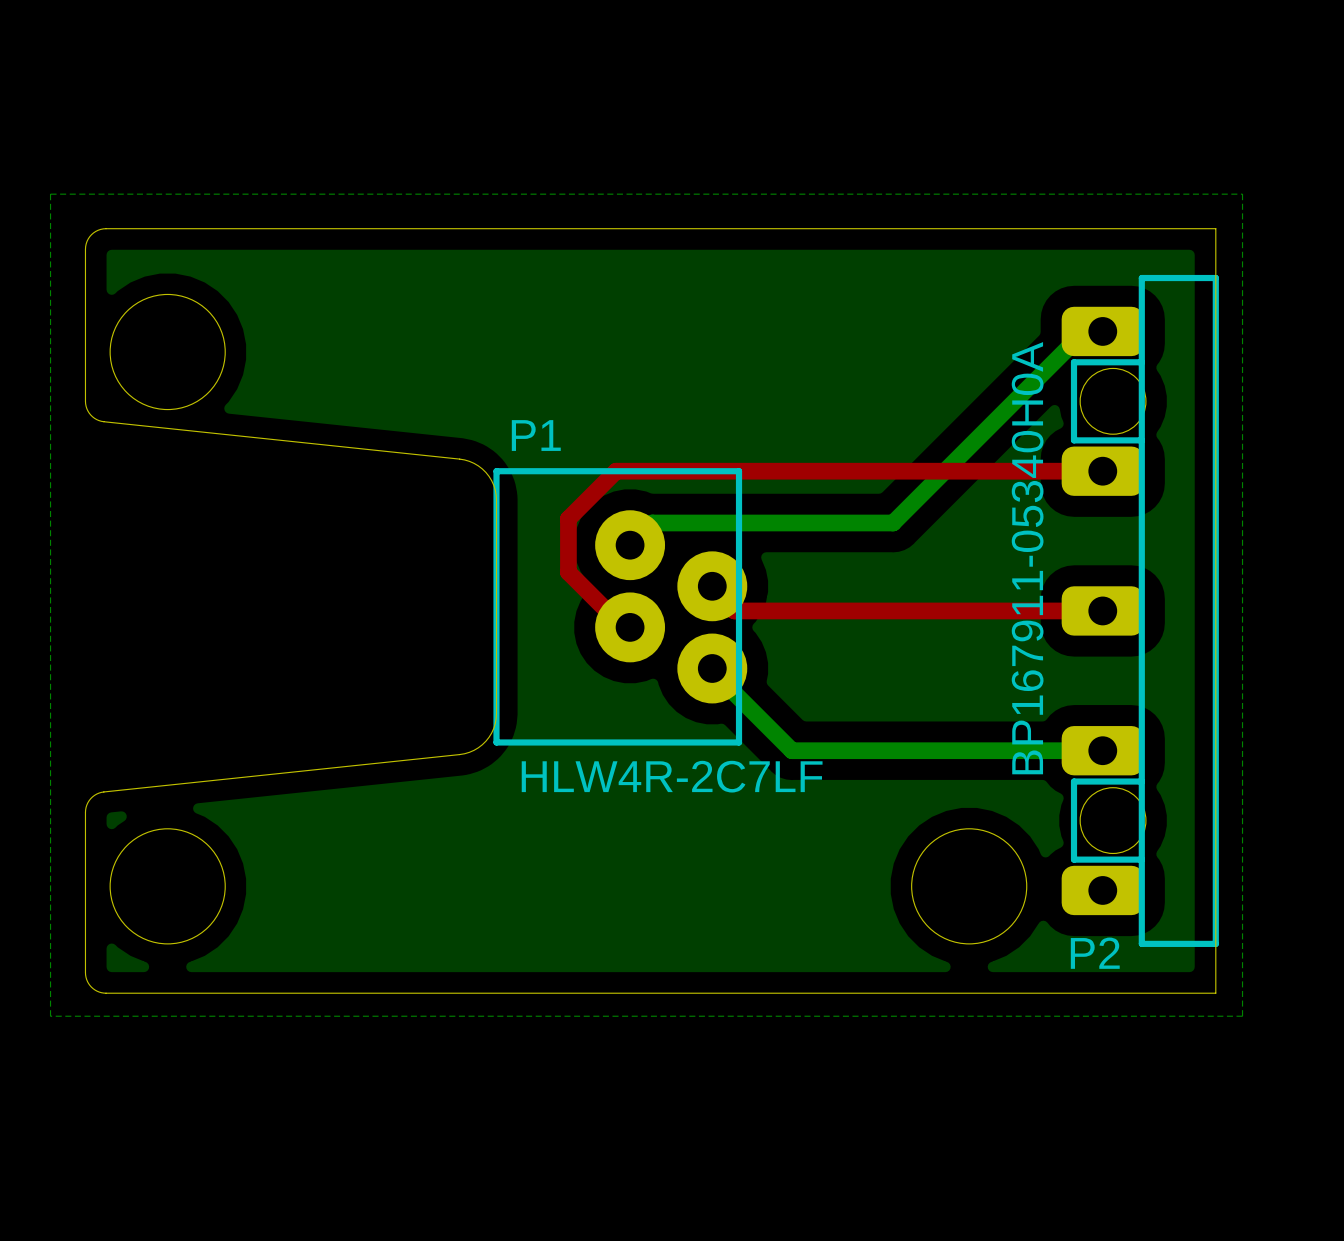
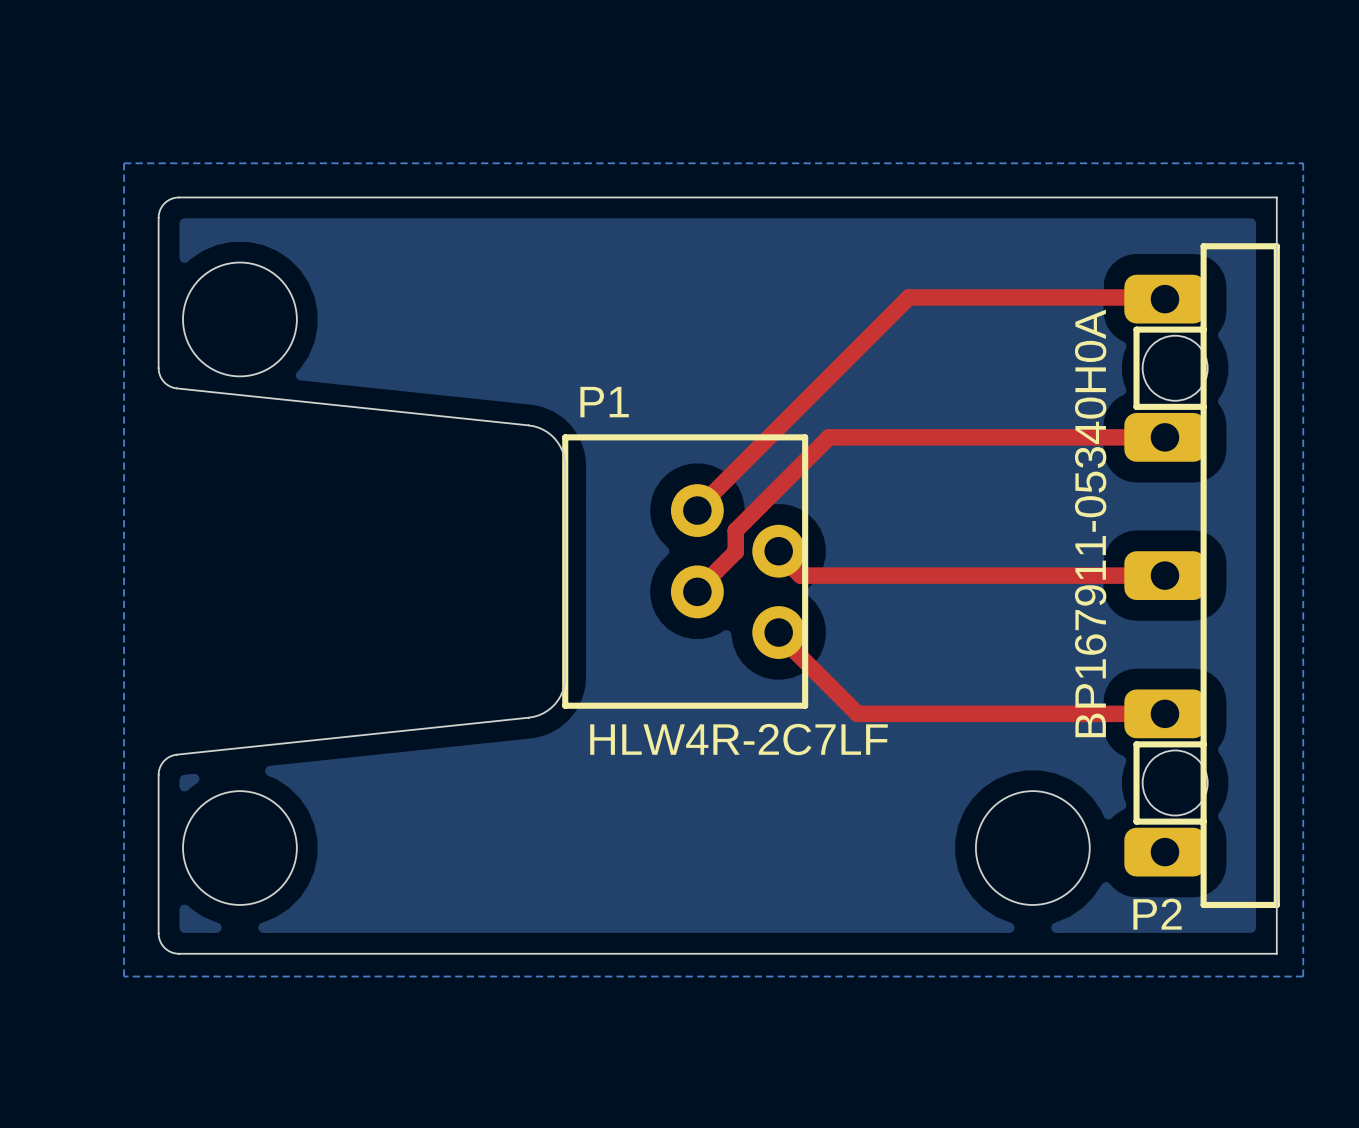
top track: none -> (1163, 297) (908, 297) (697, 508)
bottom track: (1078, 338) (893, 522) (652, 522) (630, 545) -> none
P1 footprint: [493, 468, 748, 746] -> [562, 434, 809, 709]
top track: (763, 471) (616, 471) (568, 518) (568, 572) (621, 625) (630, 625) -> (828, 437) (735, 530) (735, 551) (697, 590)
top track: none -> (778, 634) (857, 713) (1164, 713)
bottom track: (712, 670) (792, 750) (1102, 750) -> none

